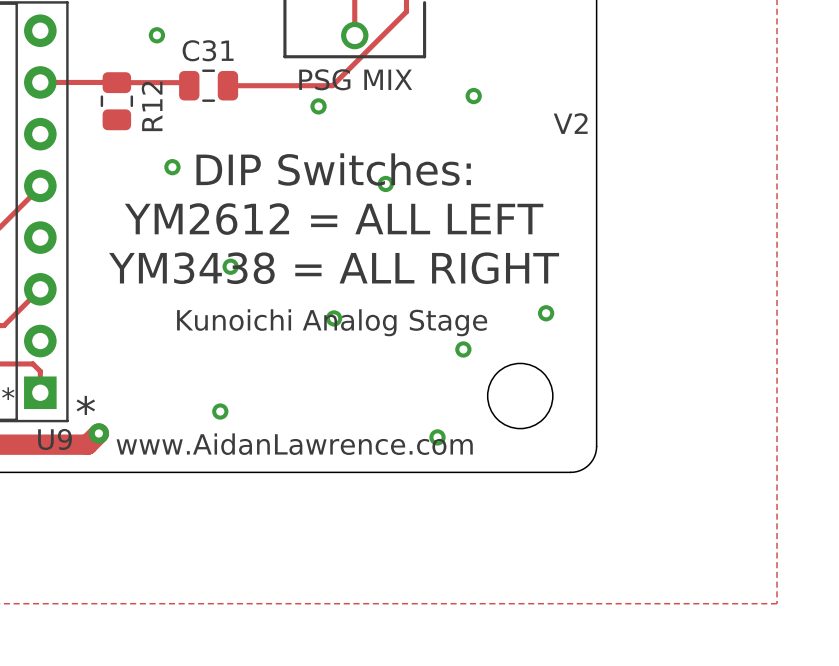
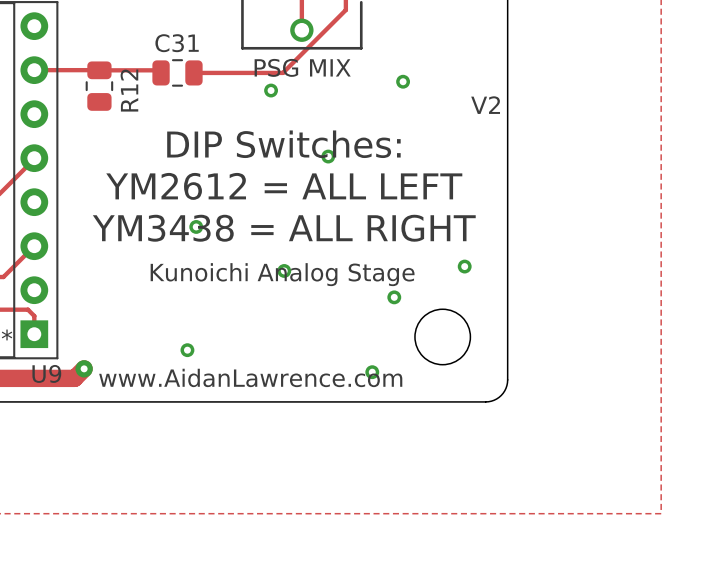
via: (156, 35) -> none
via: (172, 167) -> none
text: * (85, 405) -> none

